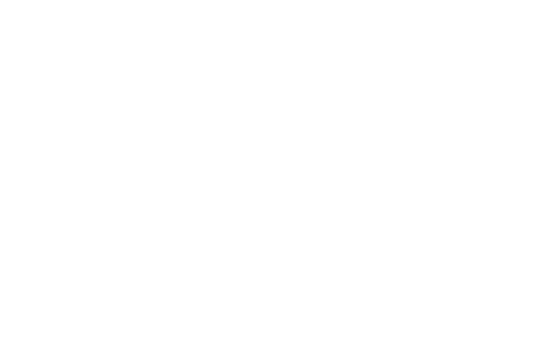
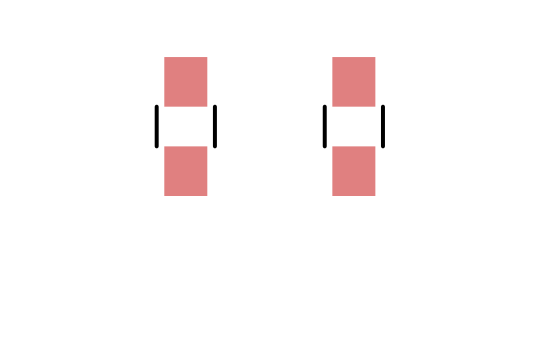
part: none -> (185, 126)
part: none -> (353, 126)

